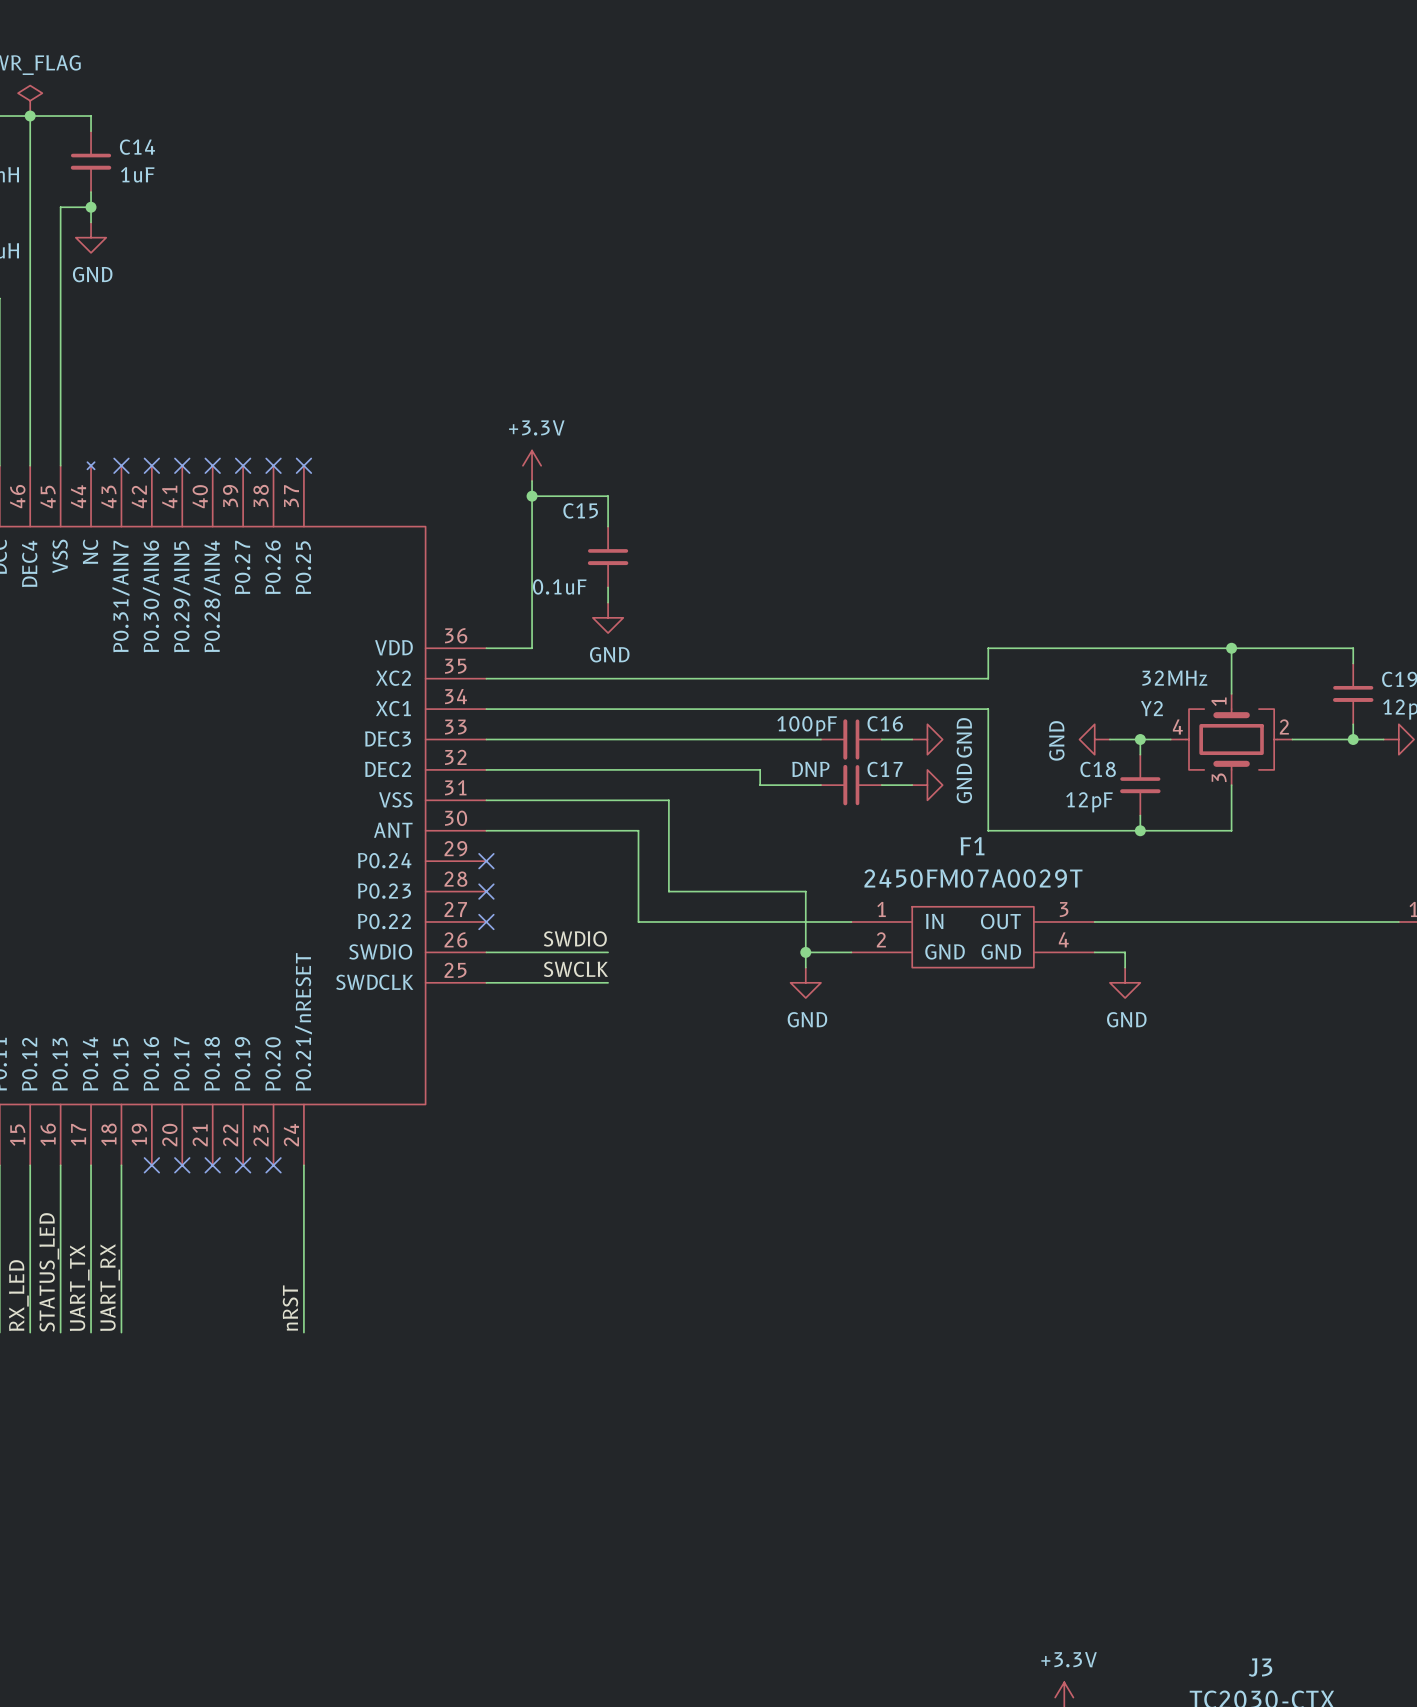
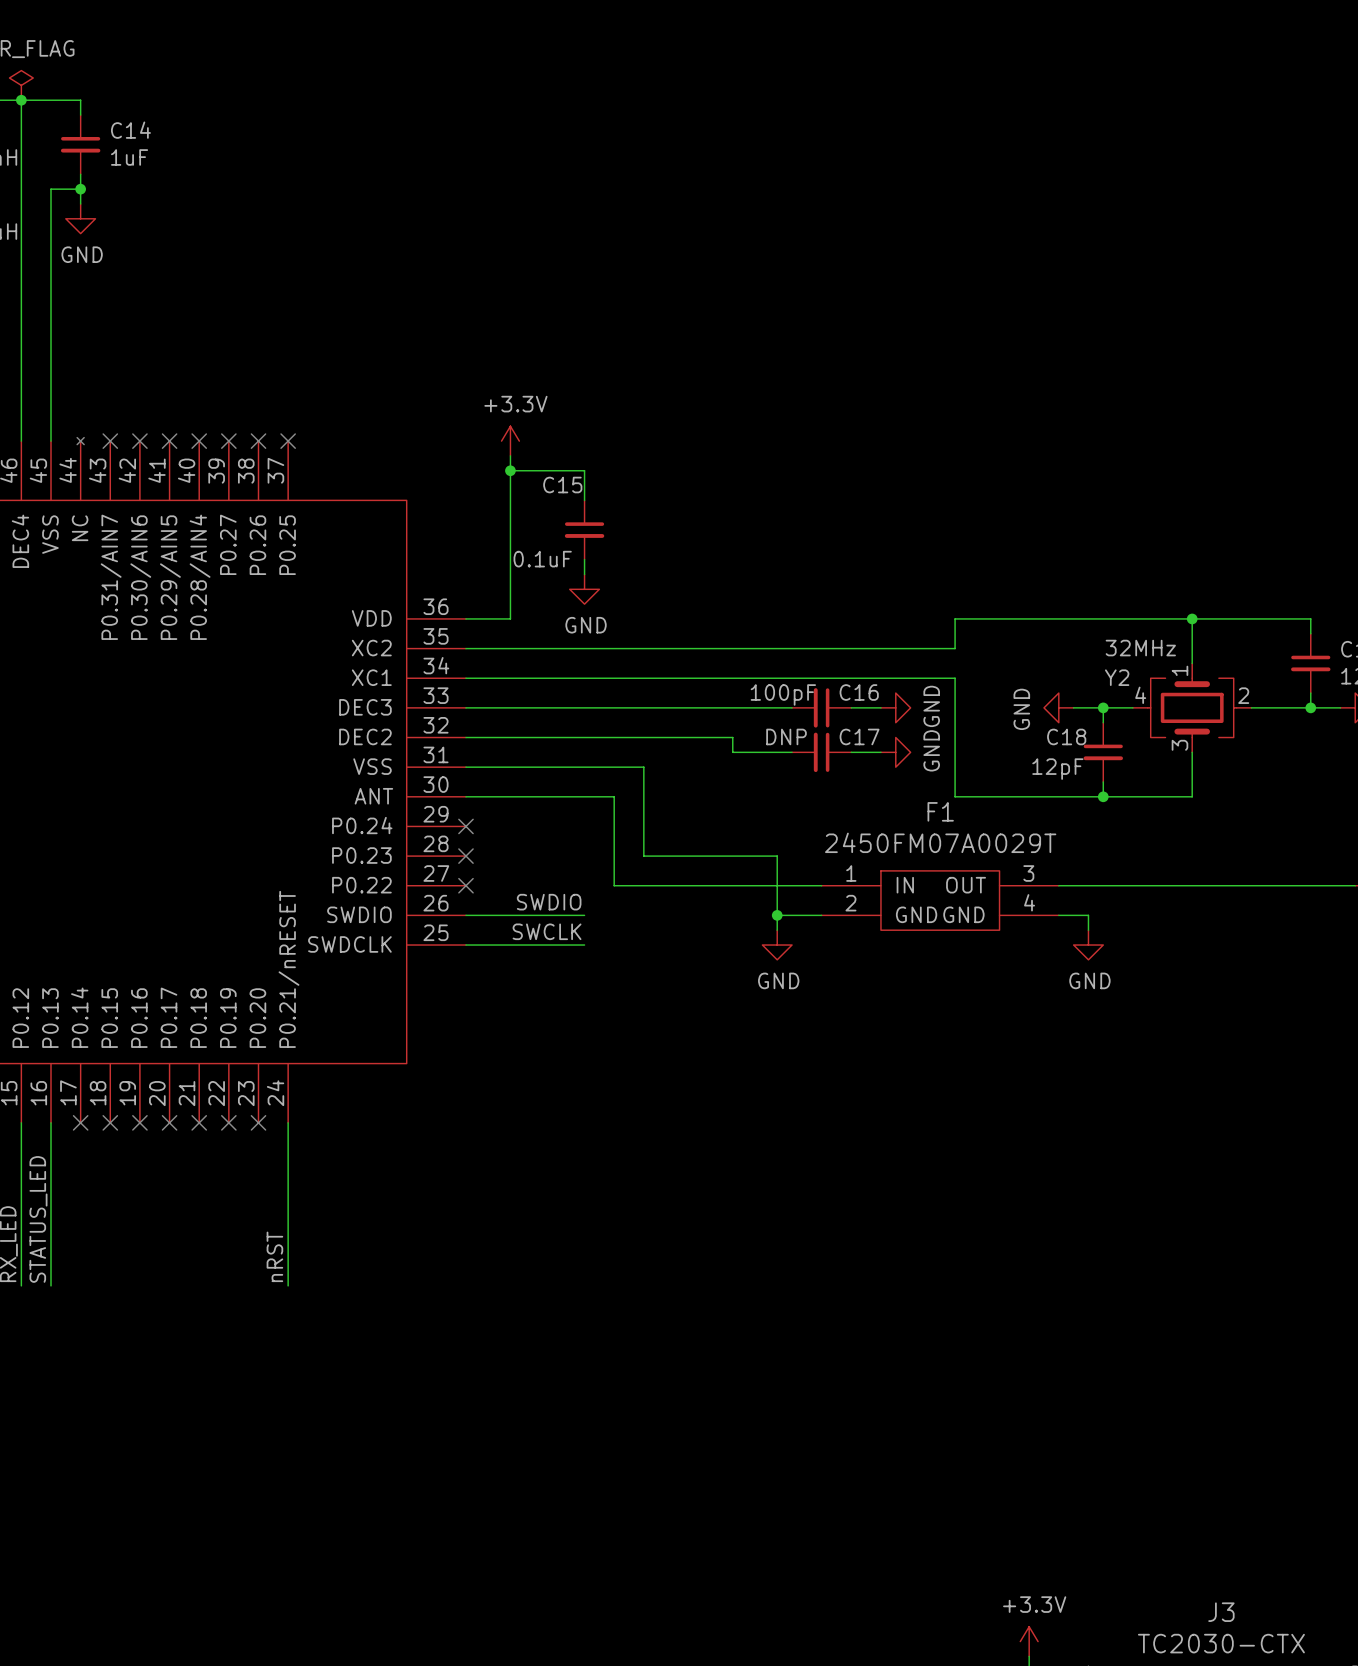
wire: (91, 1165) (91, 1332) -> none
no-connect mark: none -> (80, 1122)
wire: (121, 1165) (121, 1332) -> none
no-connect mark: none -> (110, 1122)
label: UART_RX (110, 1287) -> none
label: UART_TX (79, 1288) -> none

